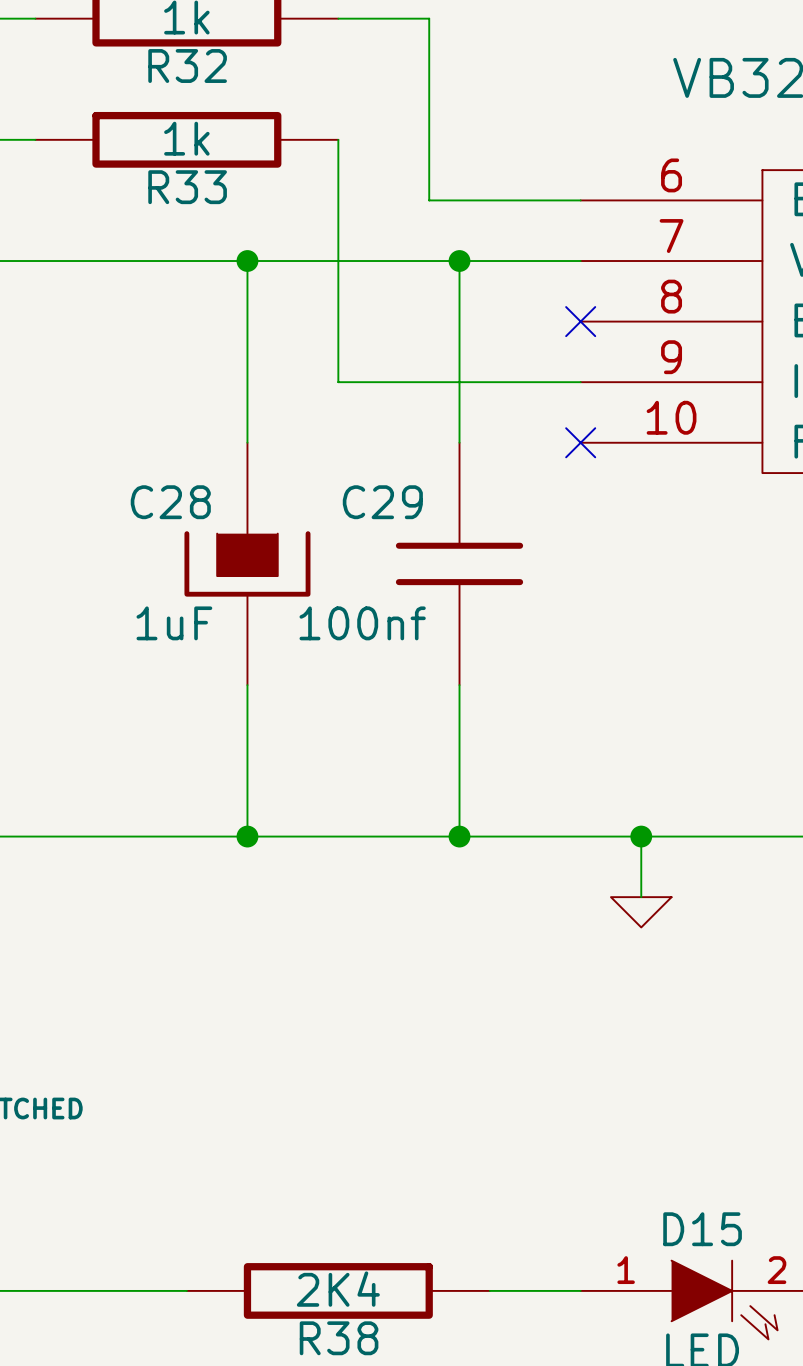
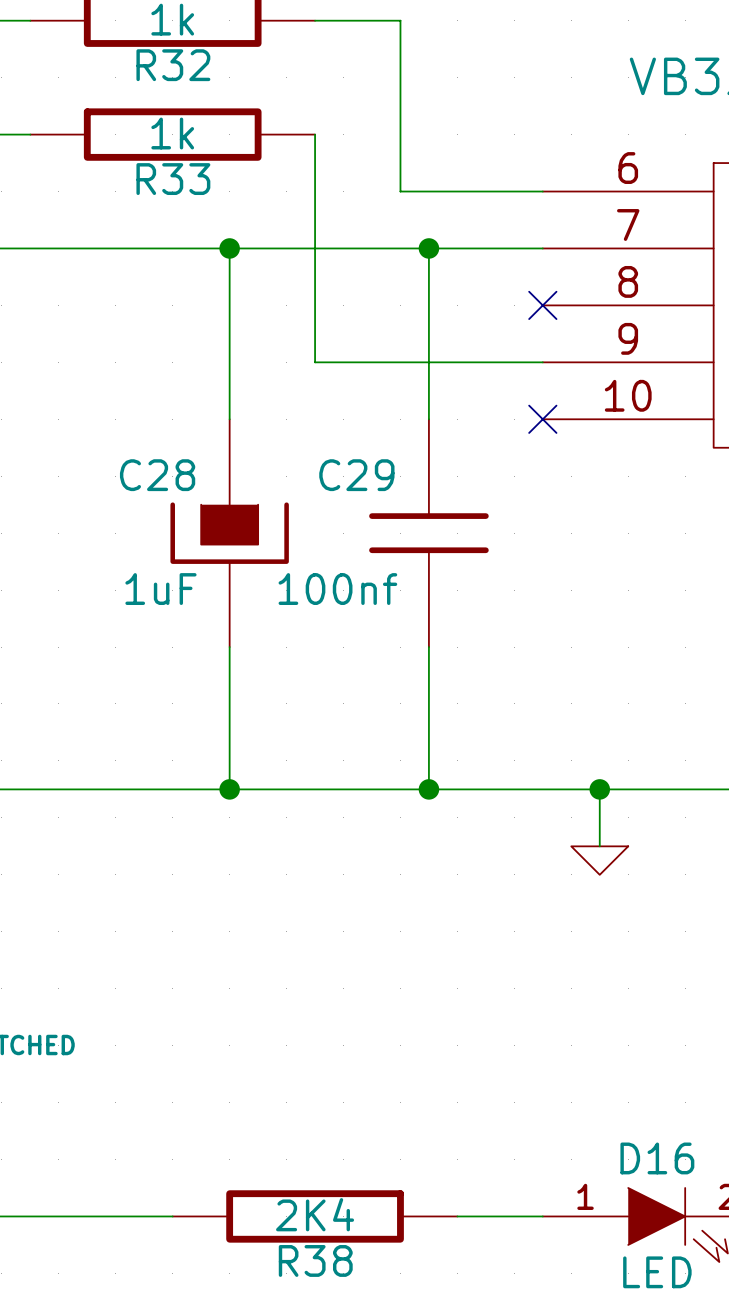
D15 name: D15 (702, 1229) -> D16 (657, 1158)

